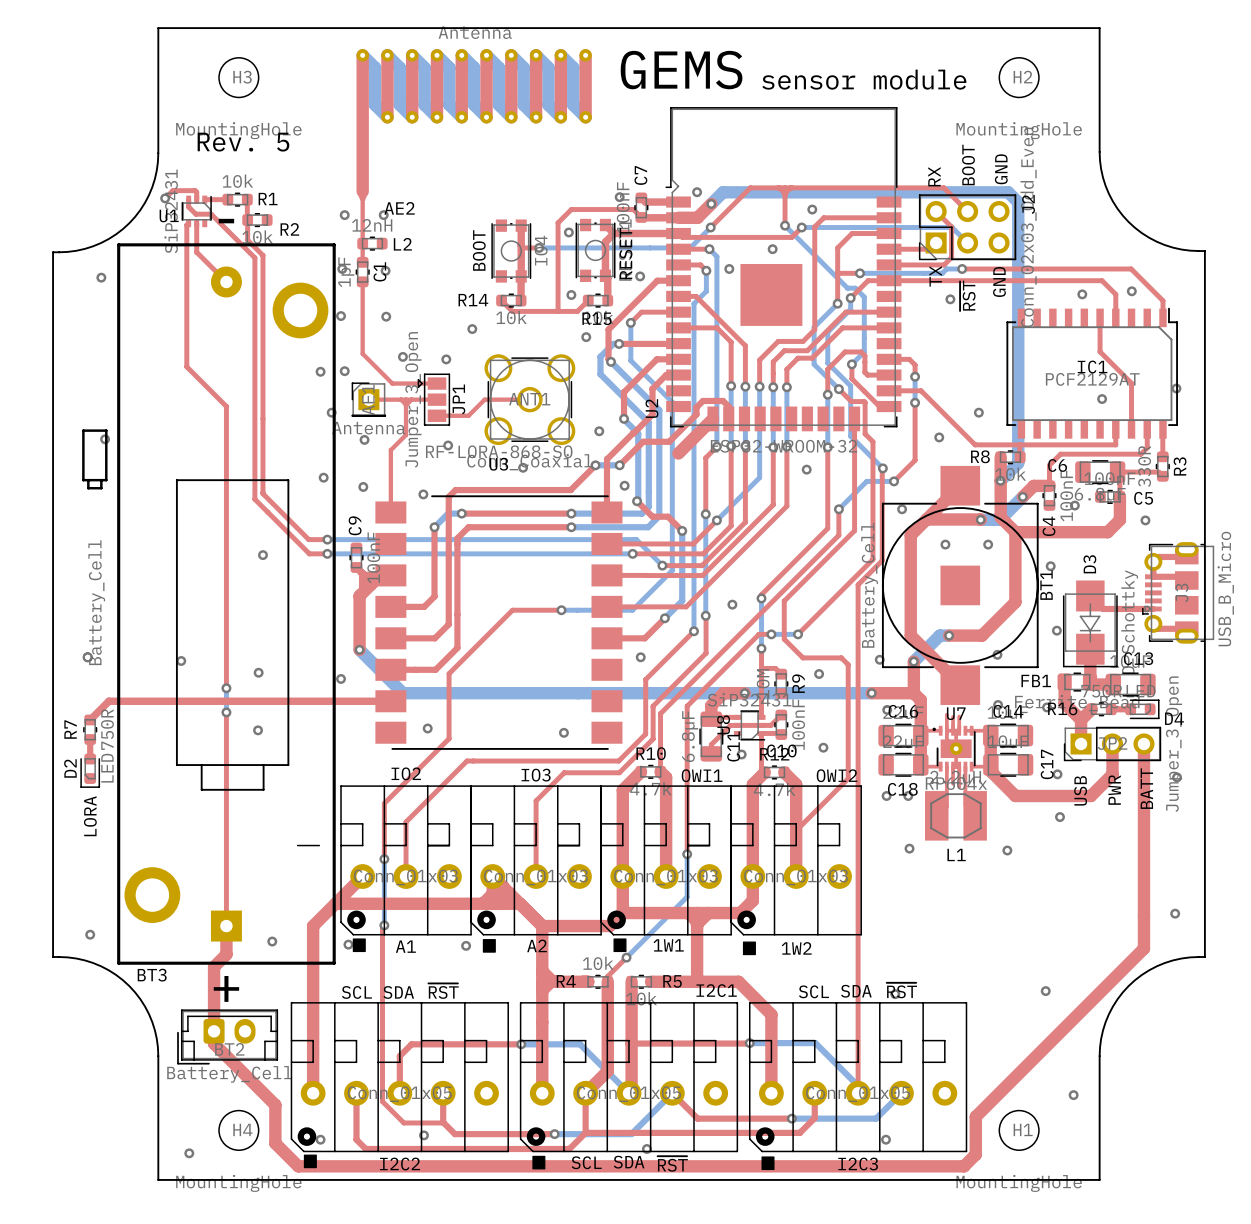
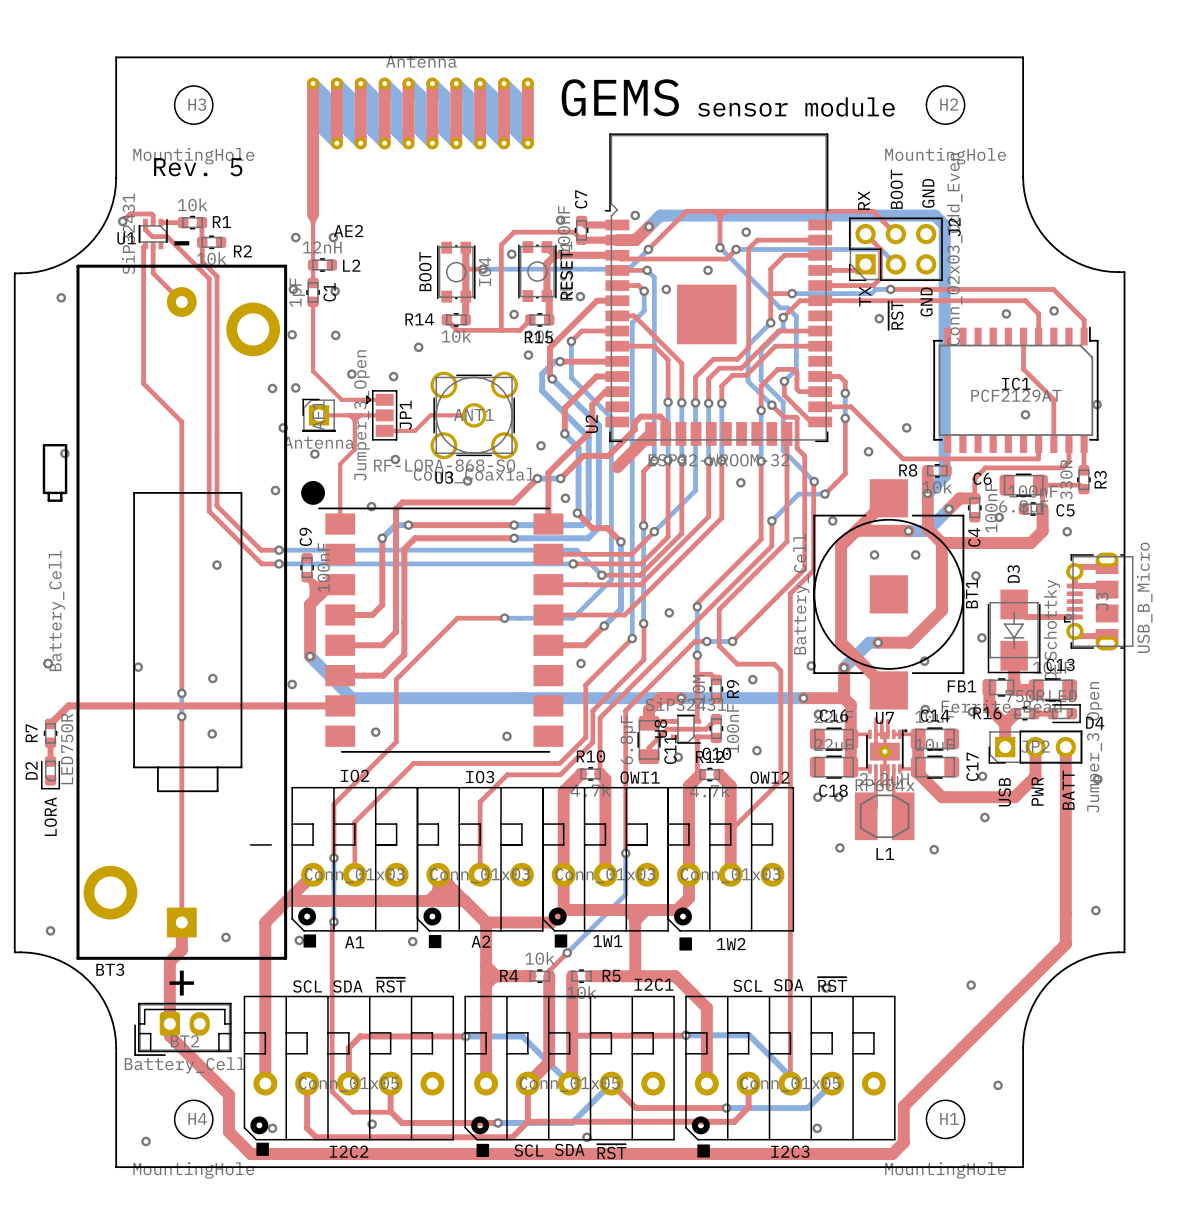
U3 footprint: [375, 495, 623, 750] -> [301, 480, 564, 753]
U7 footprint: [932, 725, 976, 772] -> [866, 729, 908, 774]

